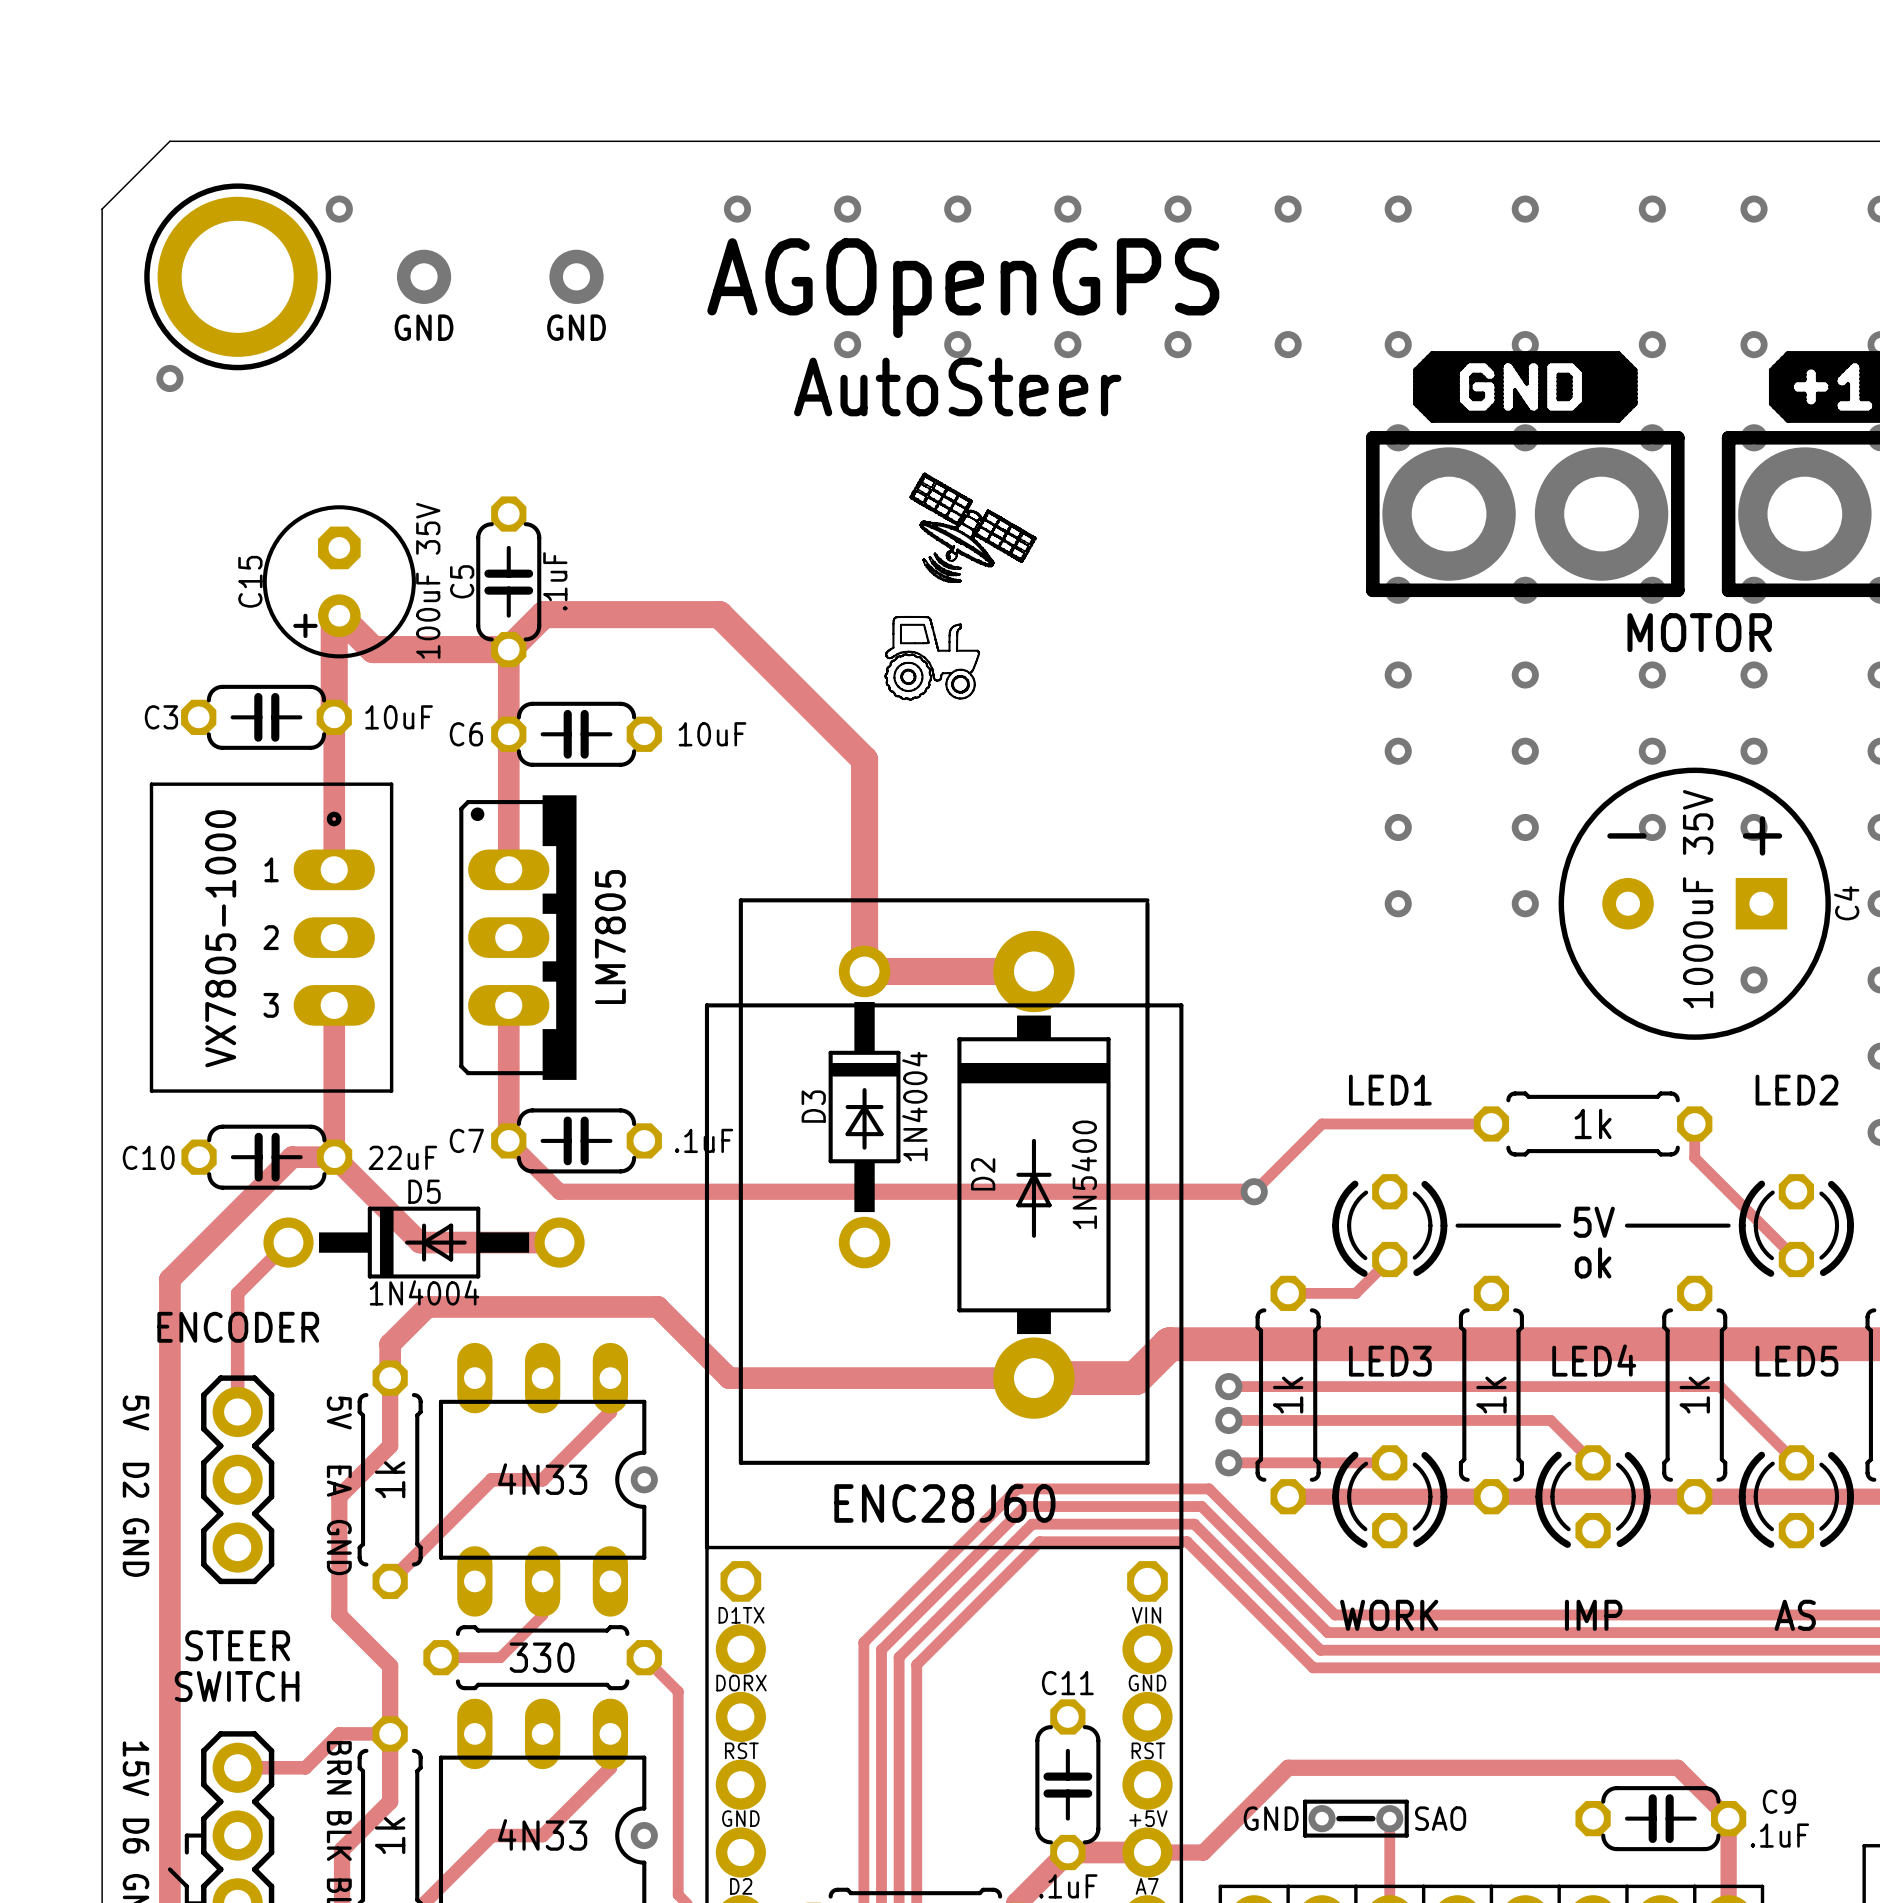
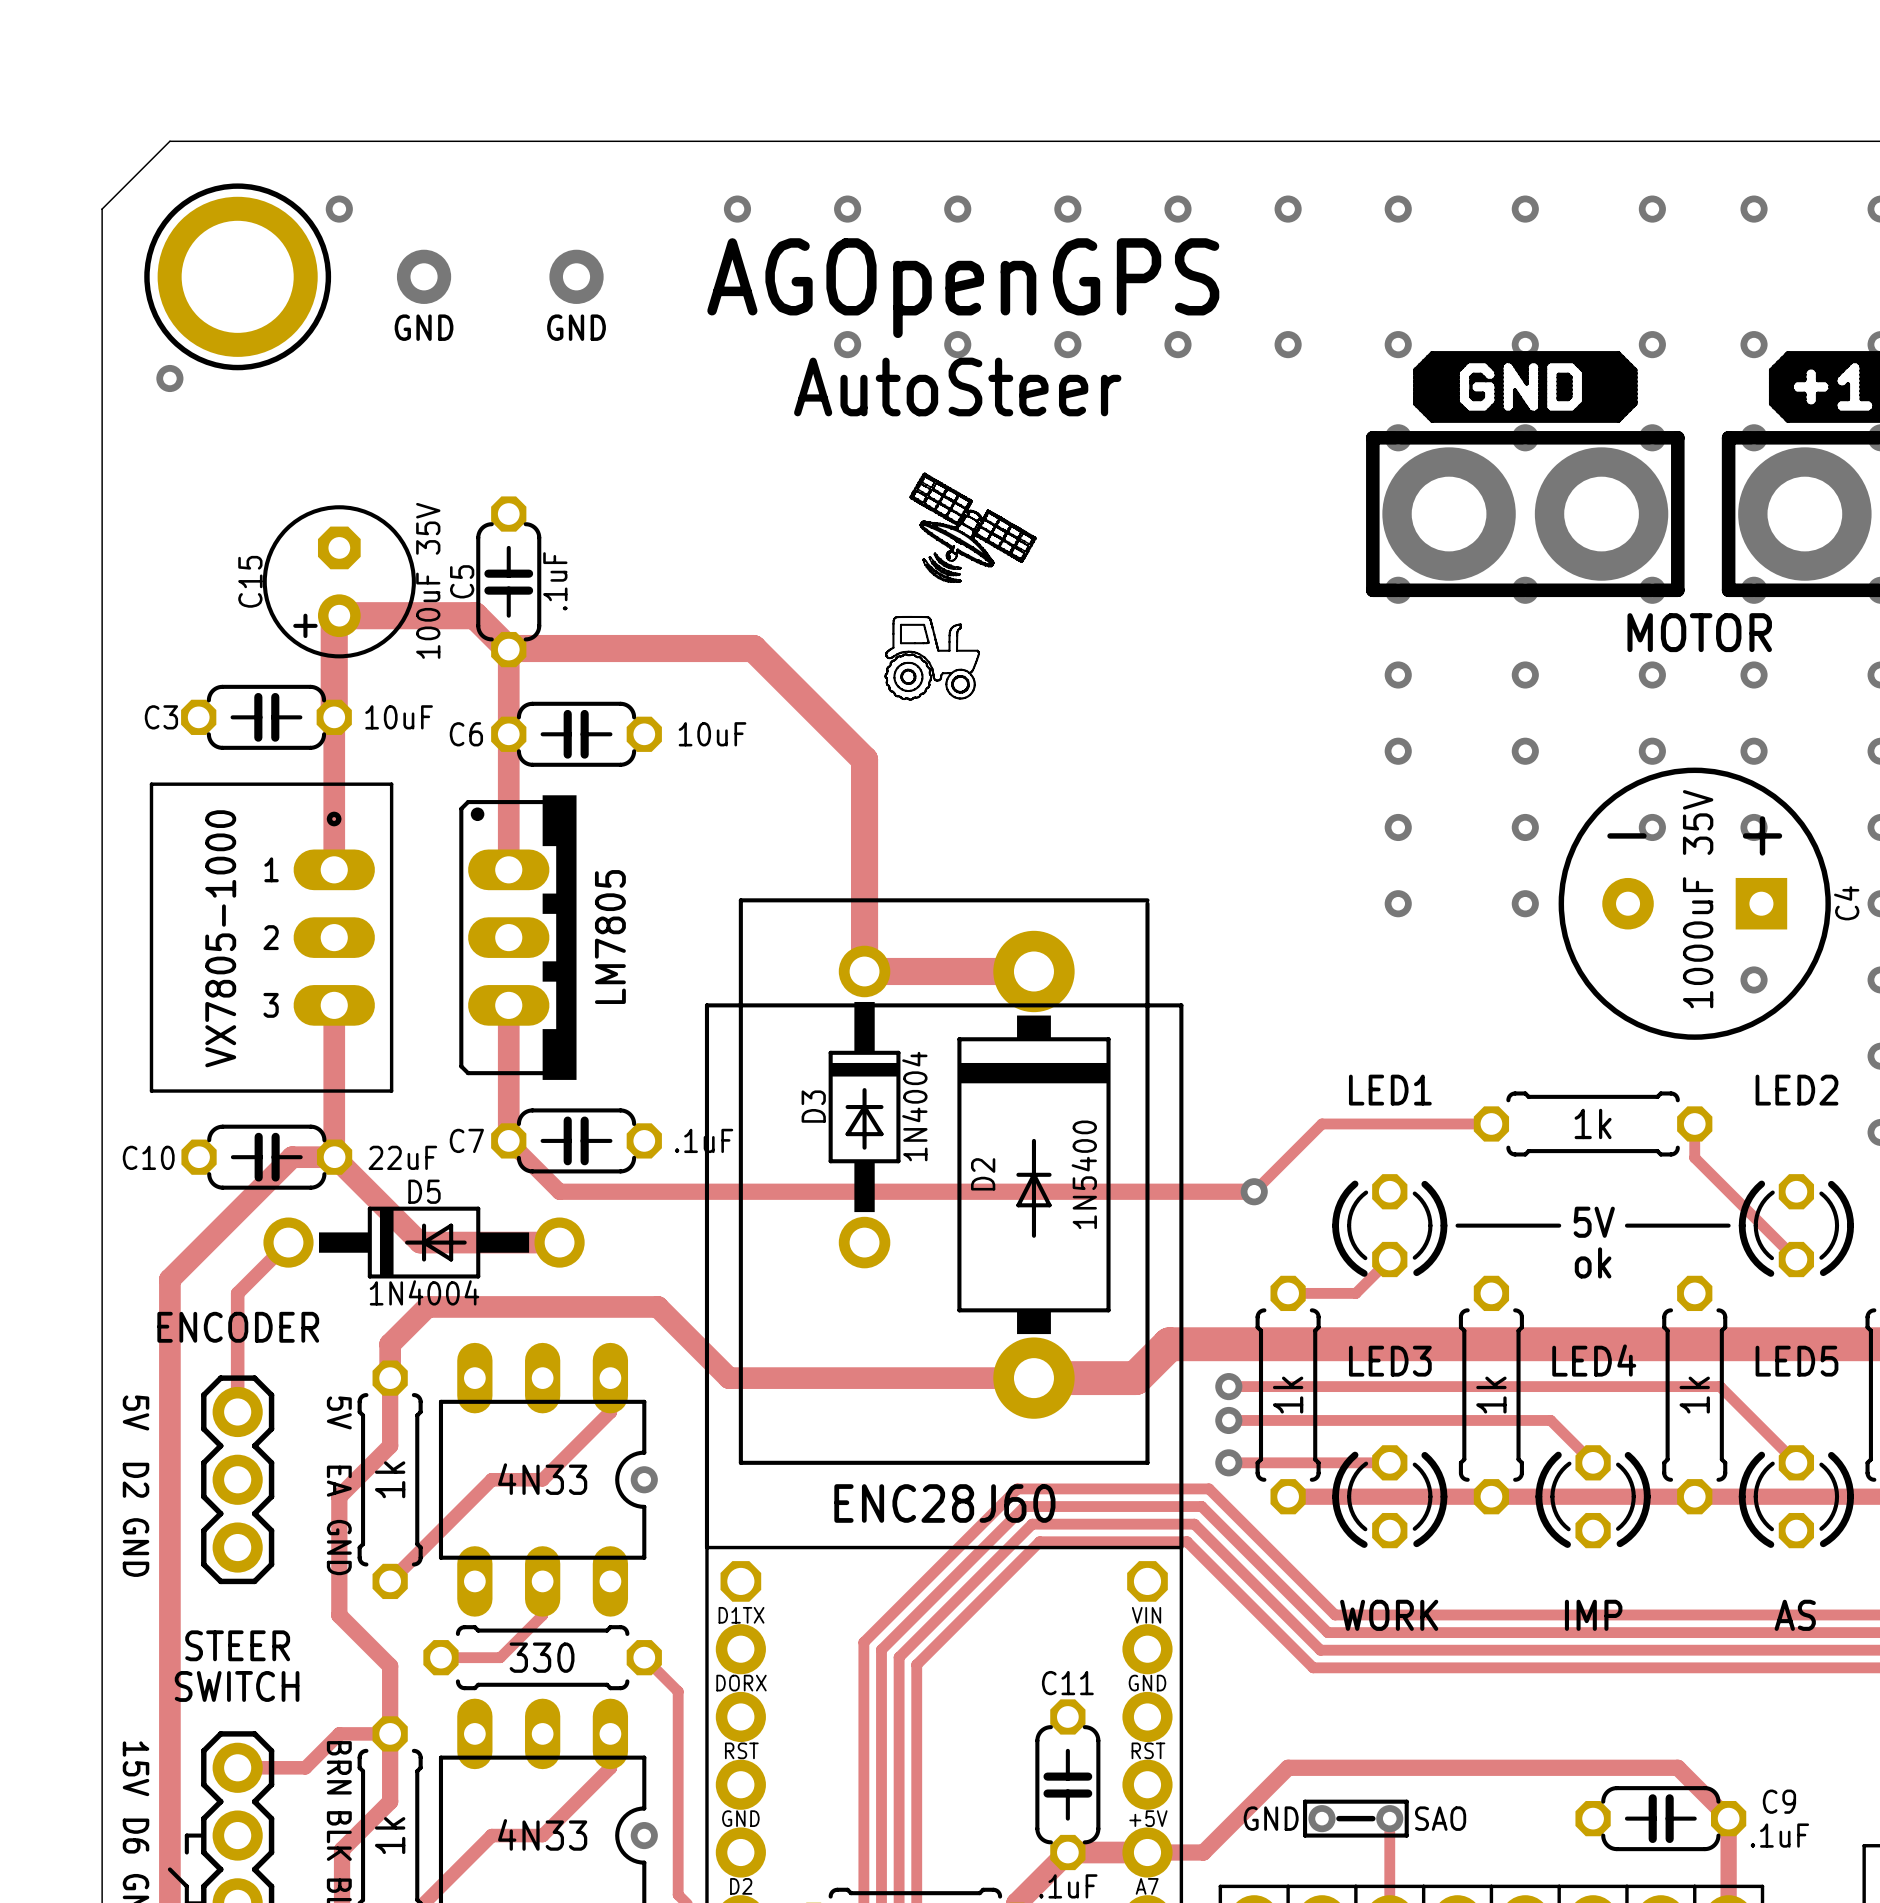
track: (339, 615) (373, 649) (508, 649) -> (339, 615) (474, 615) (508, 649)
track: (509, 648) (543, 614) (719, 614) (753, 648) -> (509, 648) (753, 648)

